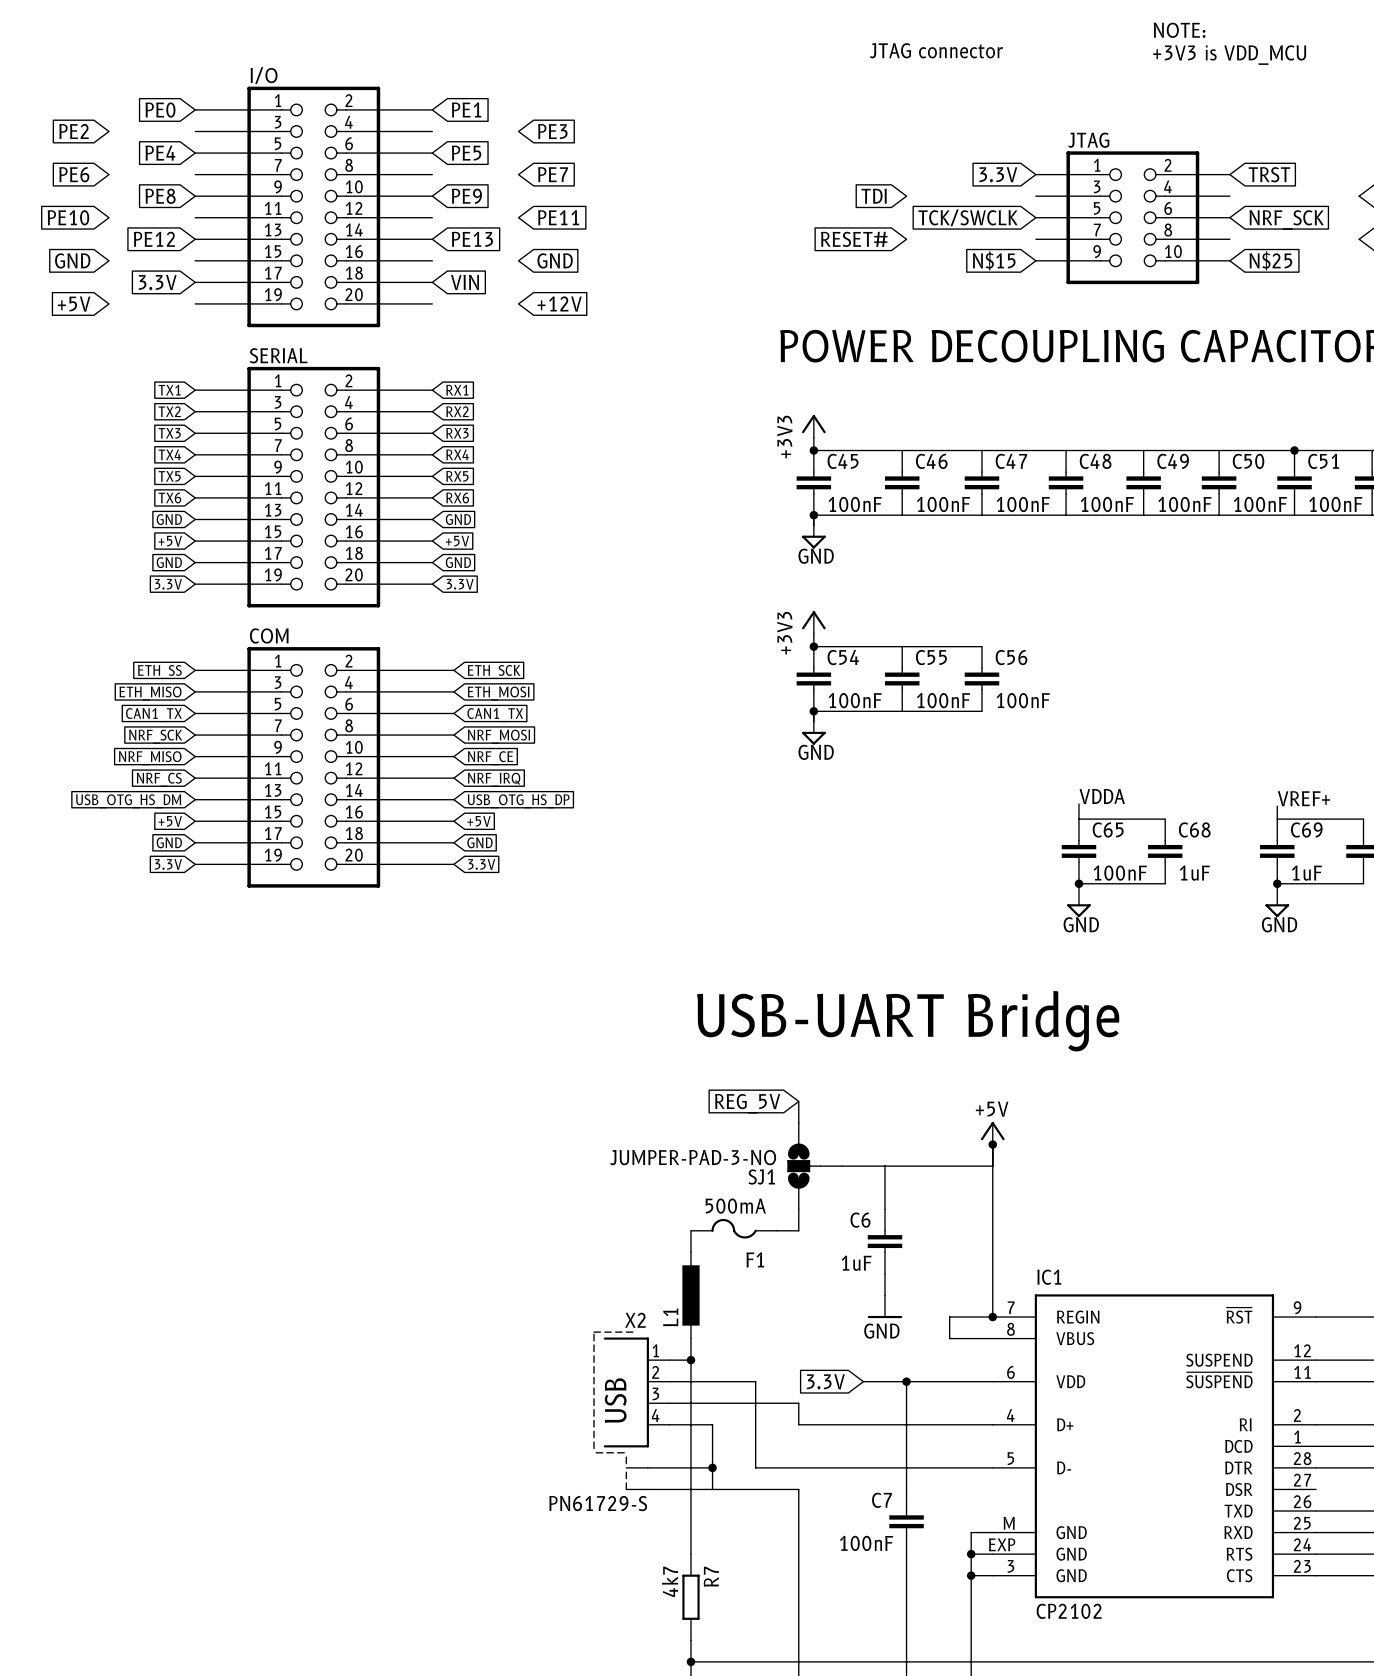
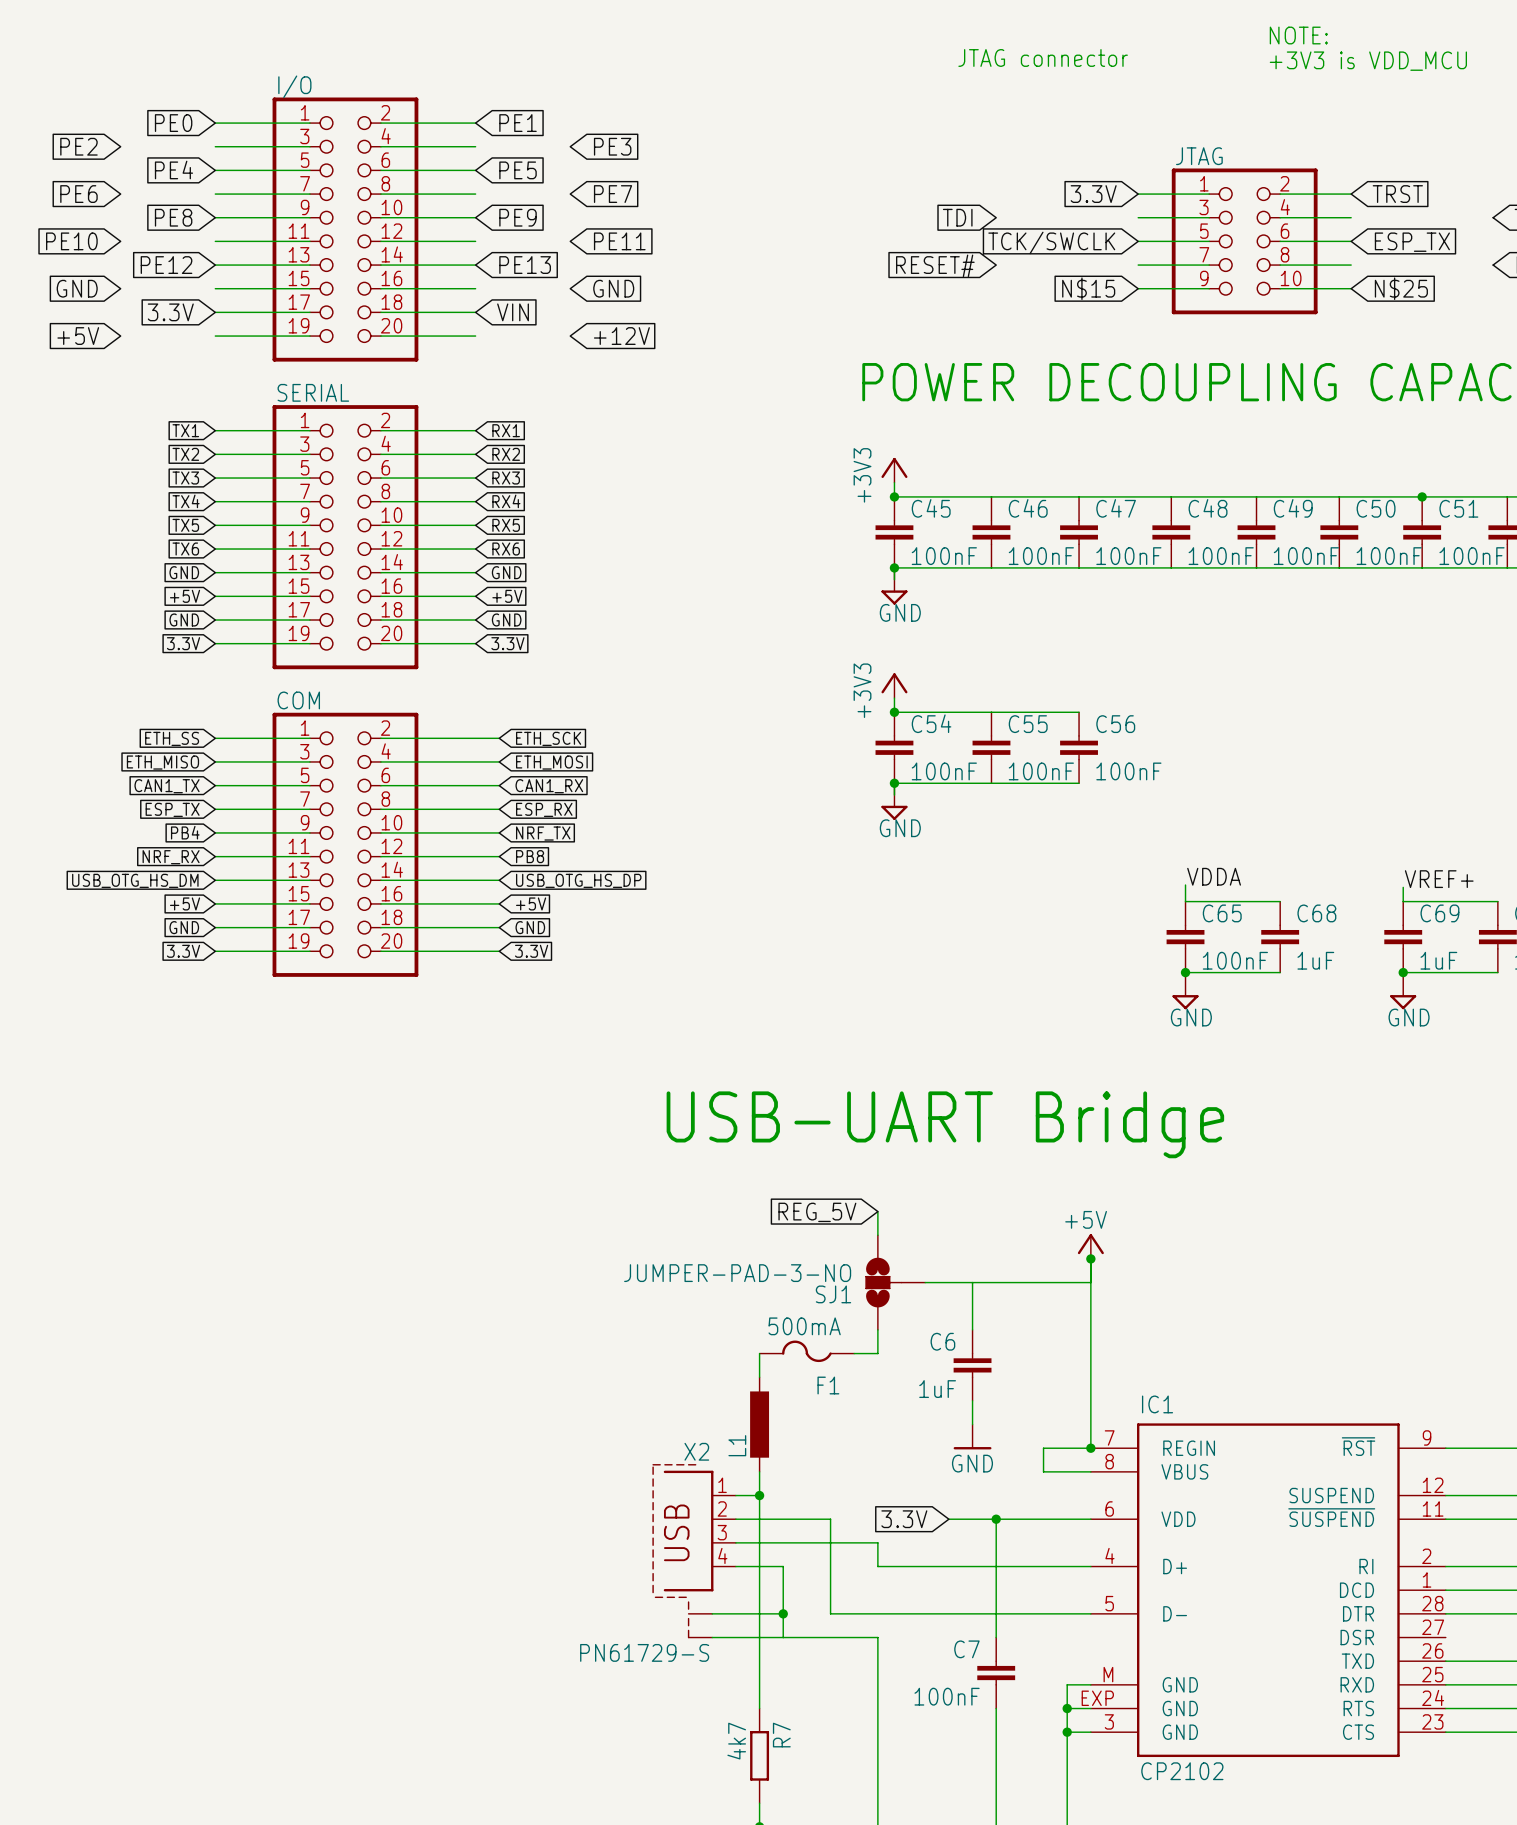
global label: NRF_SCK (1286, 219) -> ESP_TX (1412, 242)
global label: CAN1_TX (495, 715) -> CAN1_RX (549, 786)
global label: NRF_SCK (155, 736) -> ESP_TX (172, 809)
global label: NRF_MOSI (498, 736) -> ESP_RX (544, 809)
global label: NRF_MISO (150, 758) -> PB4 (185, 832)
global label: NRF_CE (490, 758) -> NRF_TX (543, 833)
global label: NRF_CS (159, 779) -> NRF_RX (171, 857)
global label: NRF_IRQ (494, 779) -> PB8 (530, 856)

